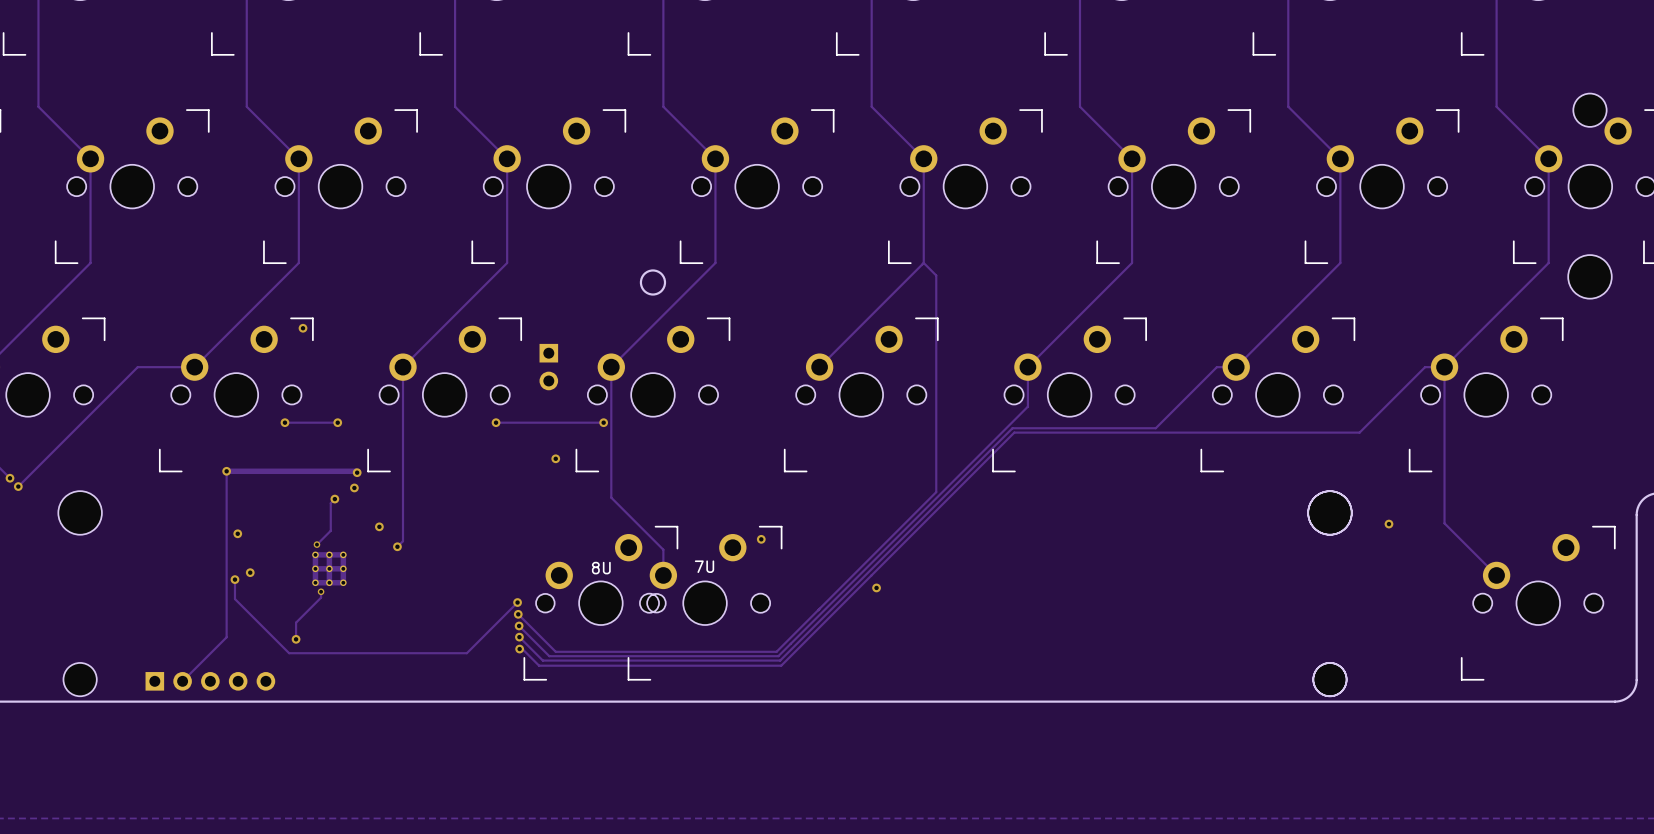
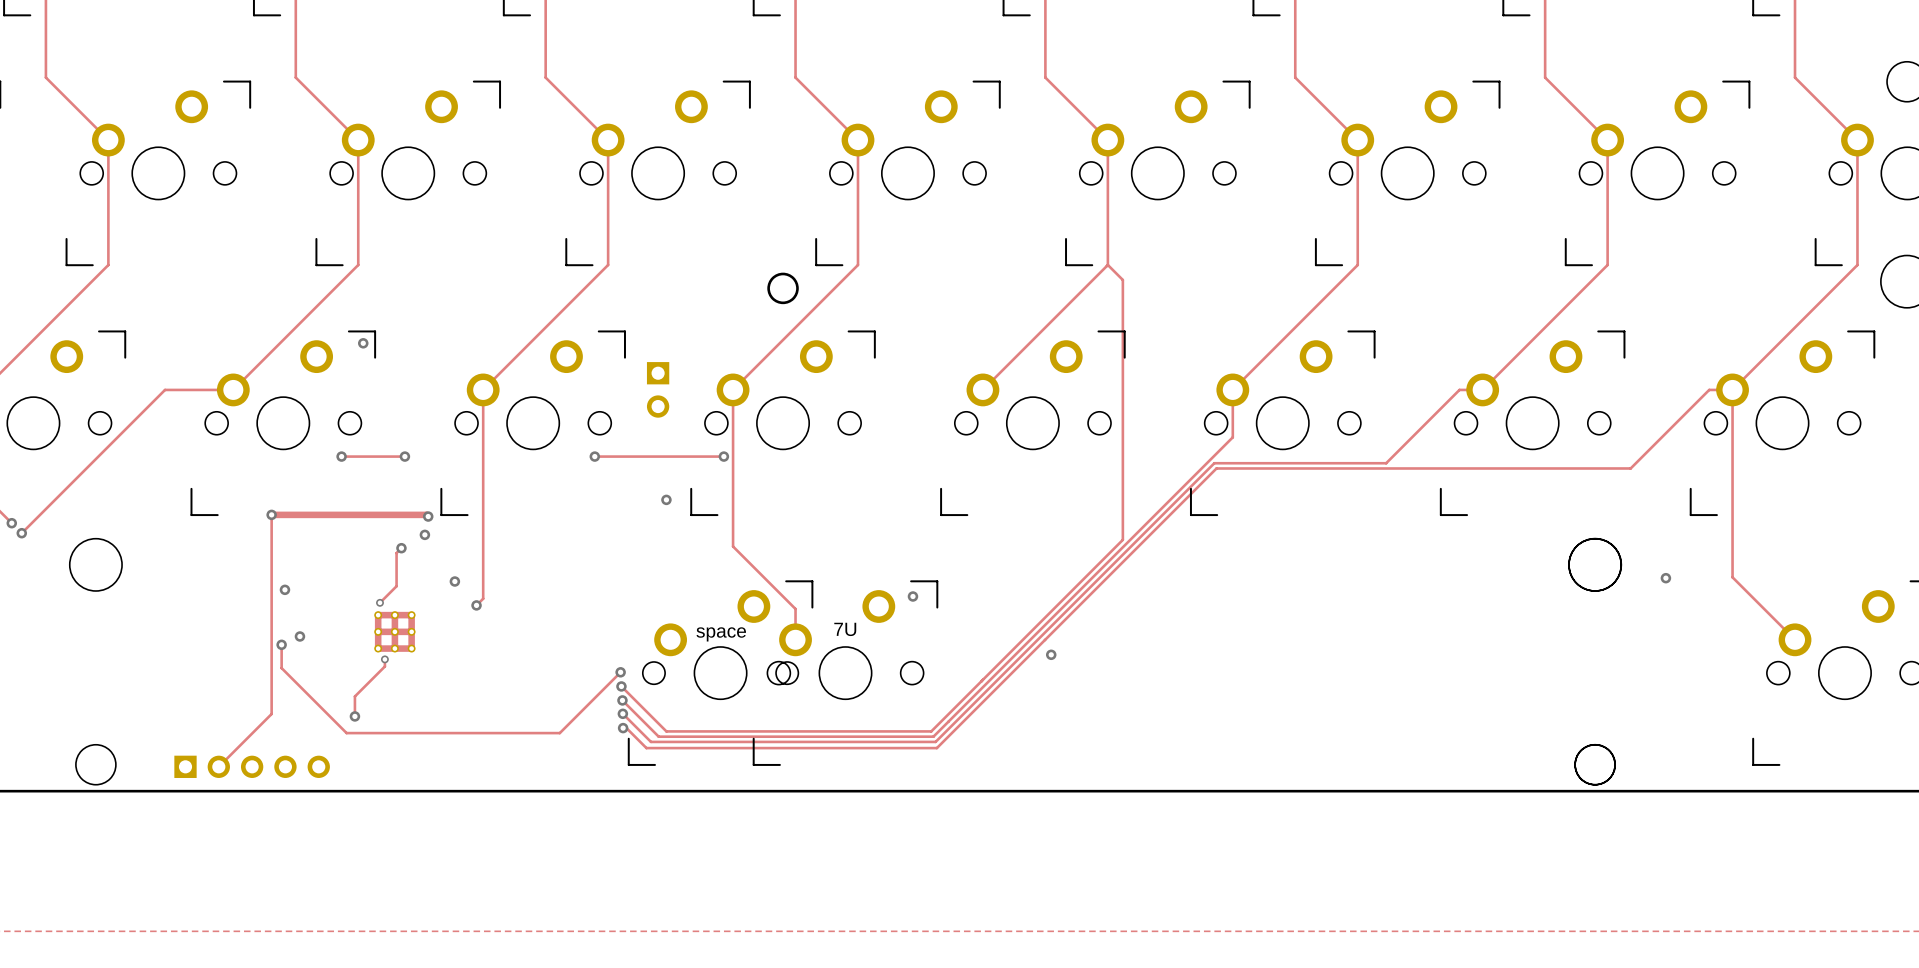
part value: 8U (601, 568) -> space (721, 634)

